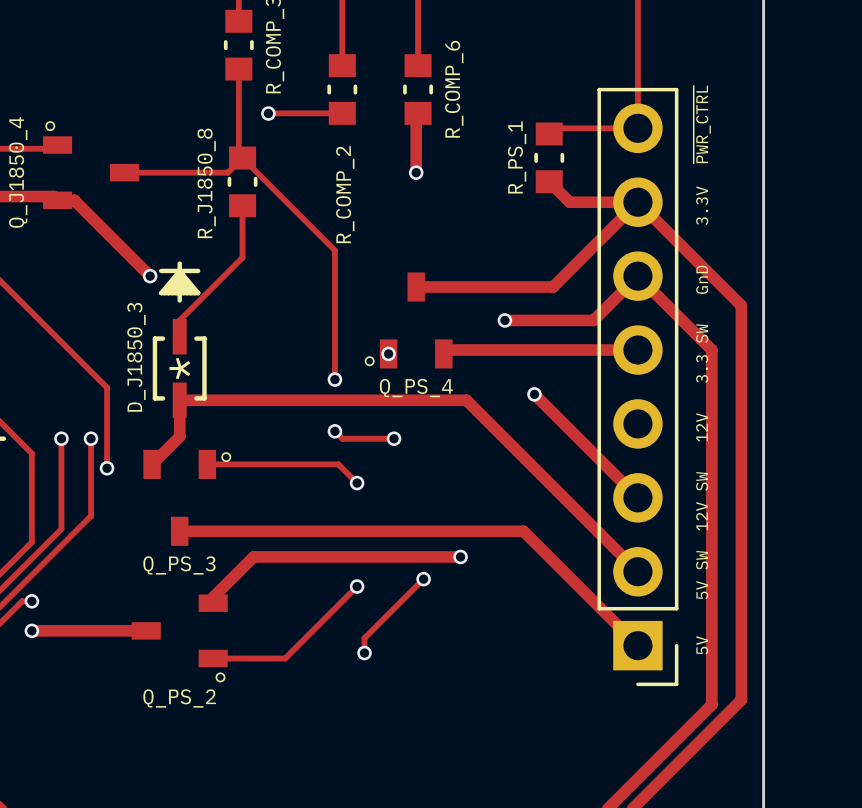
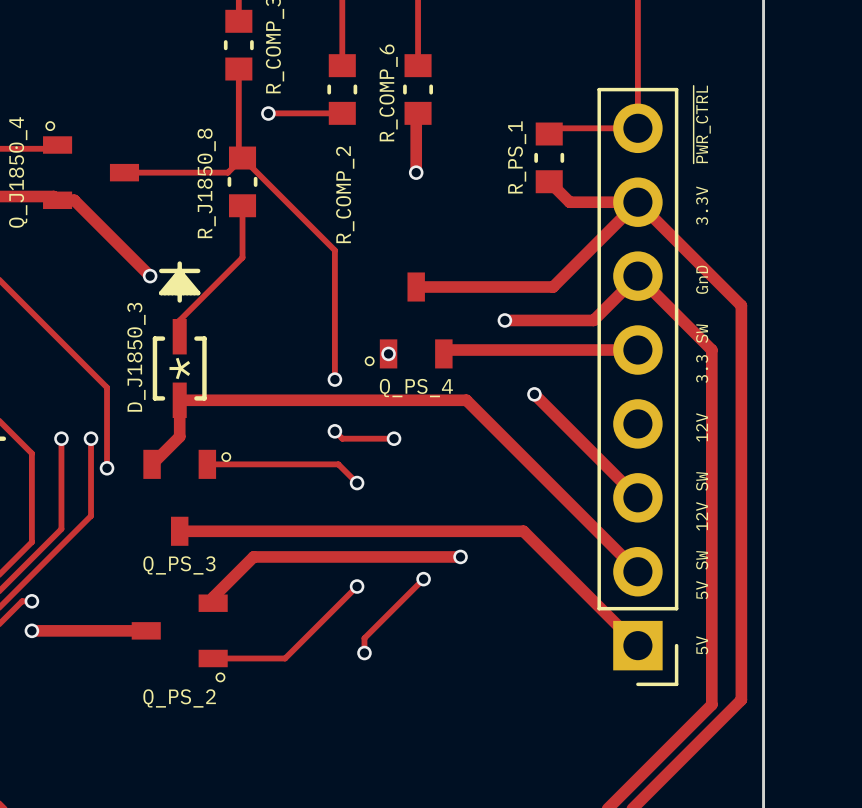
R_COMP_6 name position: R_COMP_6 (454, 89) -> R_COMP_6 (388, 92)

